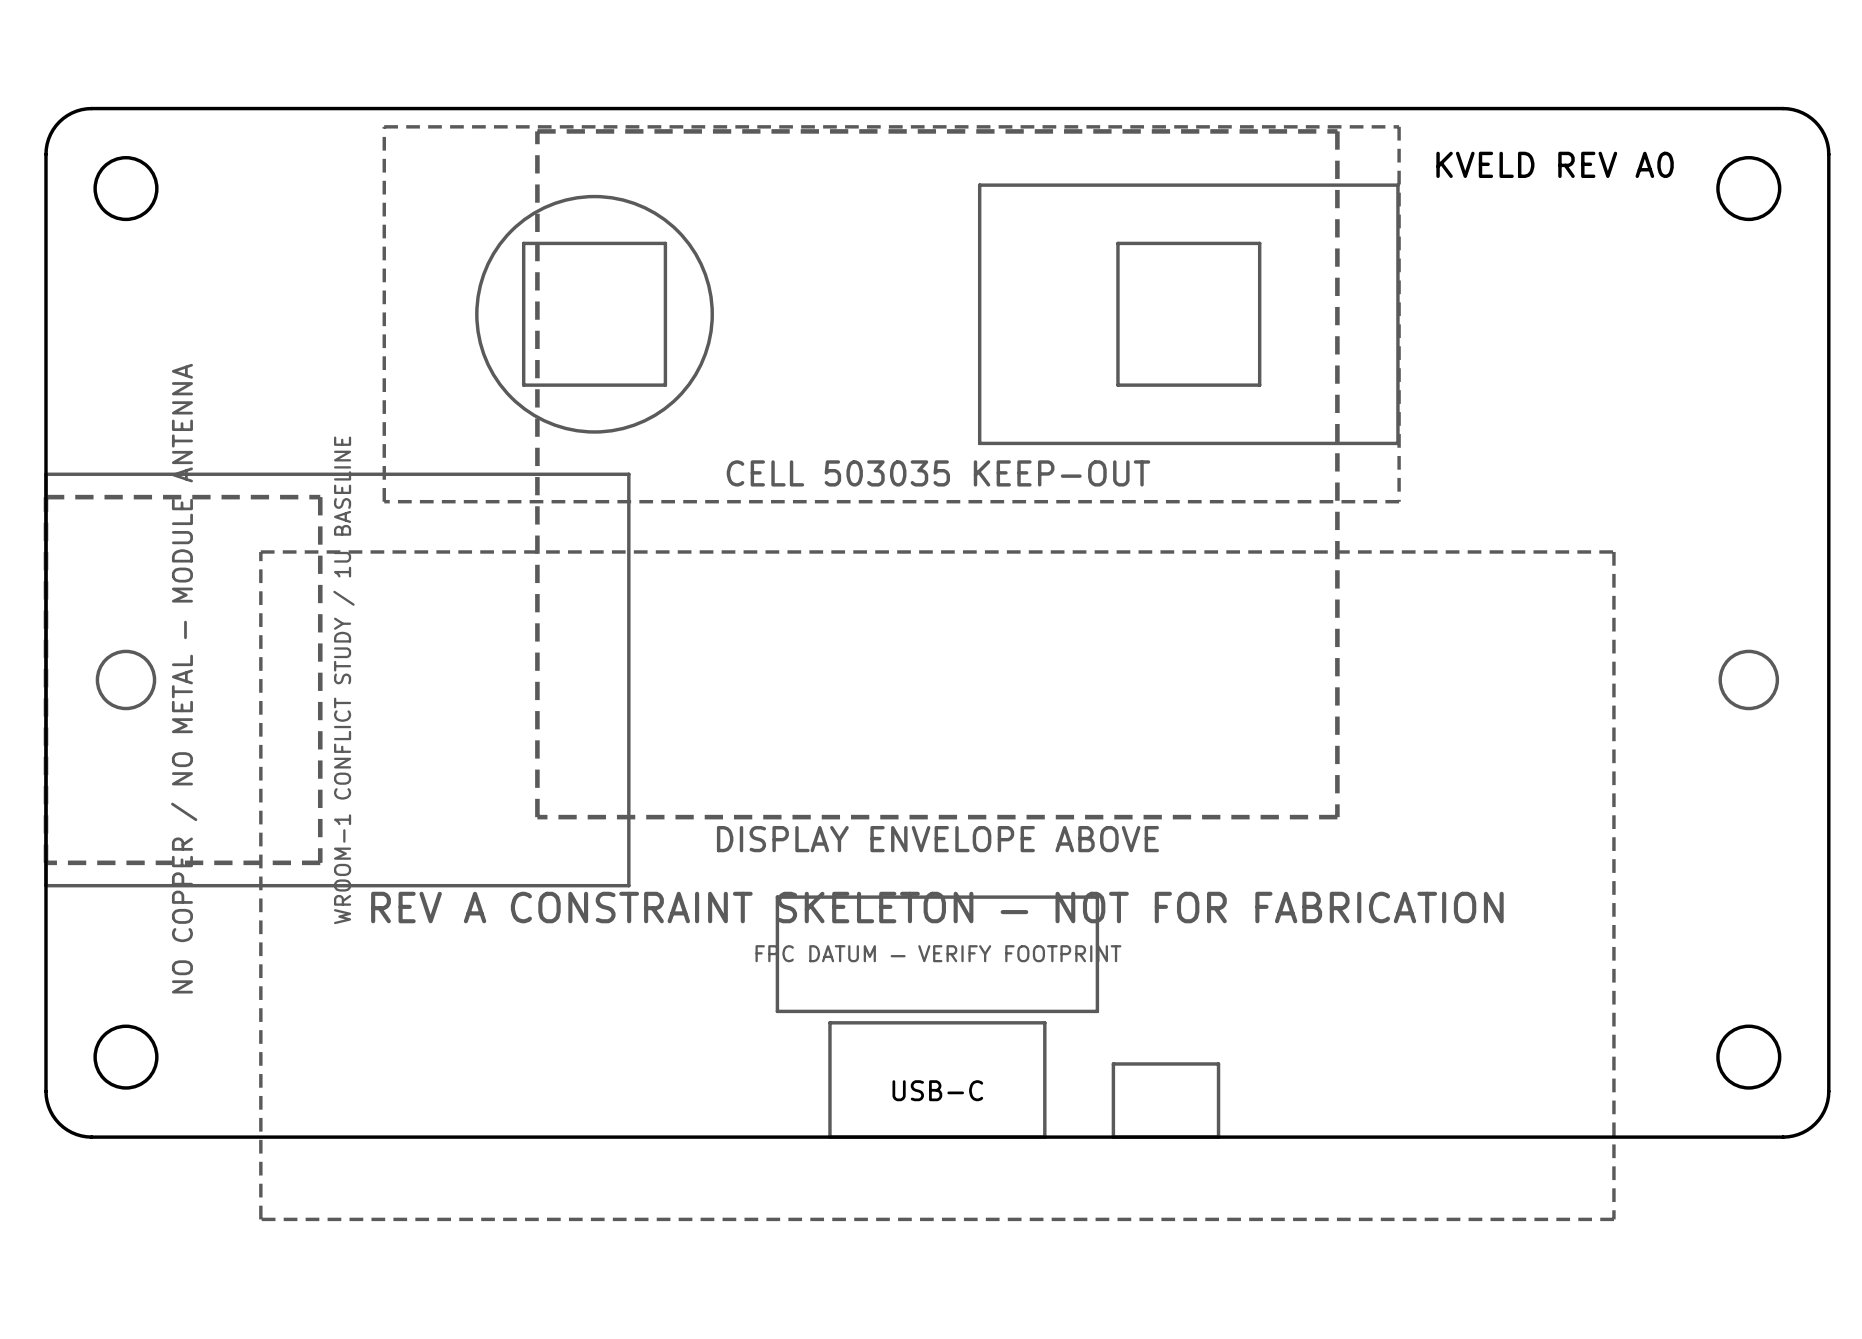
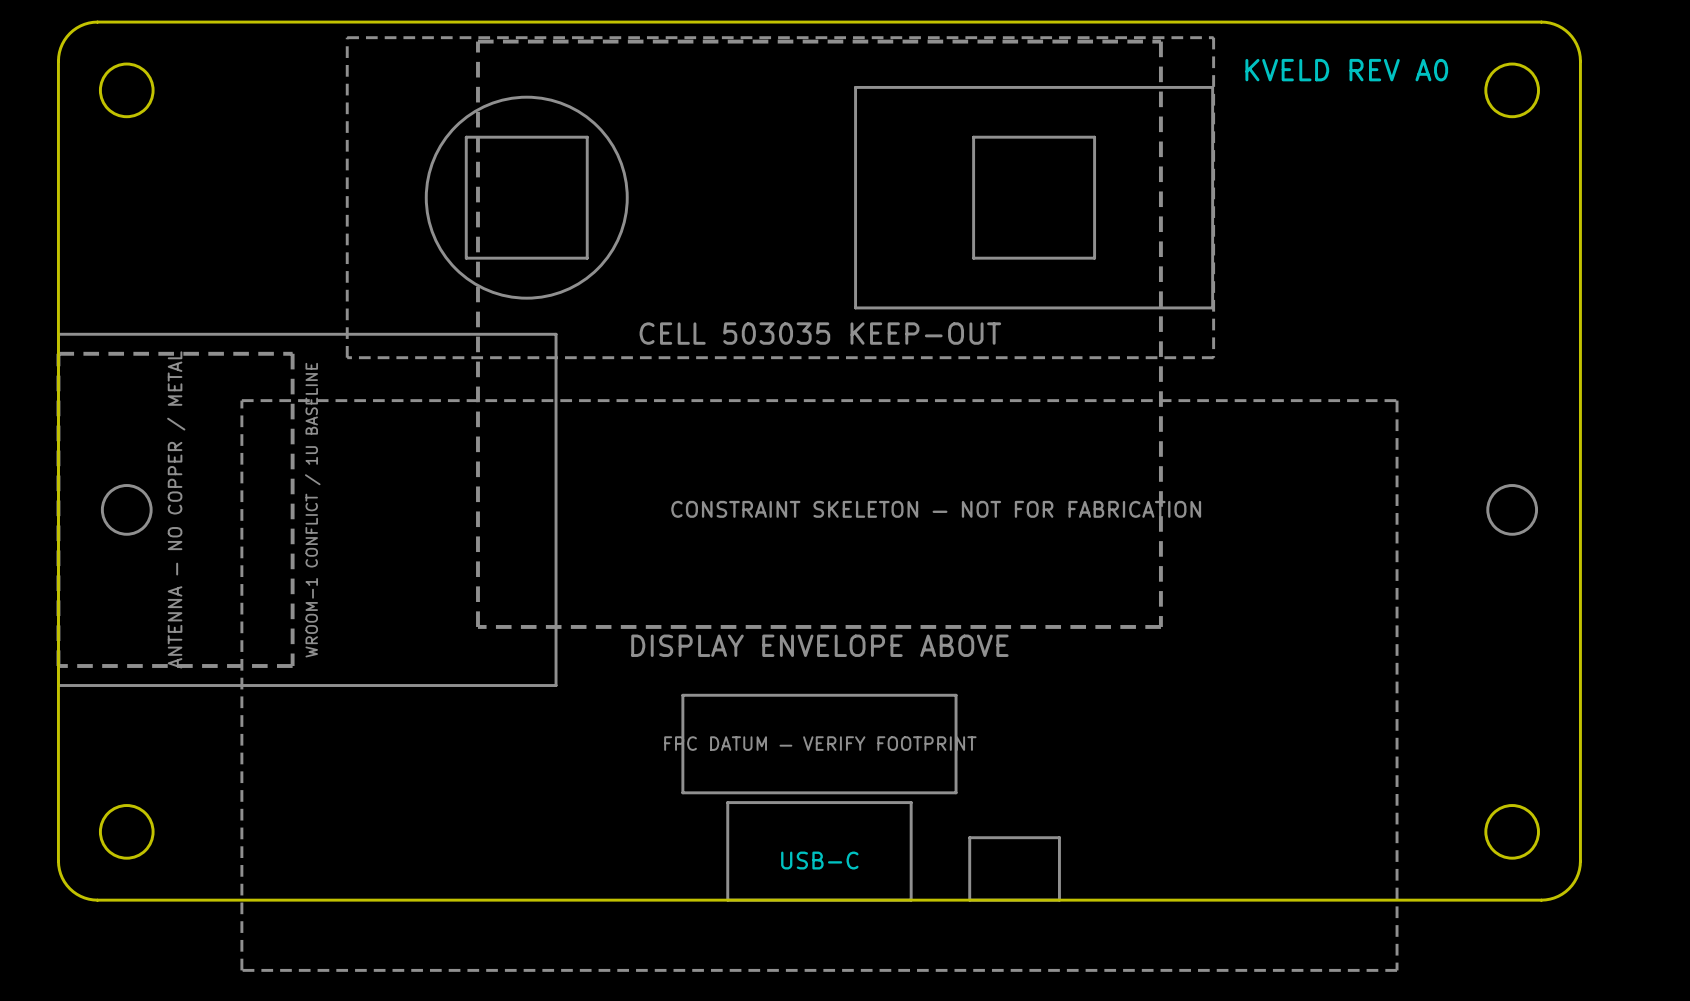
text: NO COPPER / NO METAL — MODULE ANTENNA (184, 678) -> ANTENNA — NO COPPER / METAL (176, 509)
text: none -> CONSTRAINT SKELETON — NOT FOR FABRICATION (936, 509)
text: WROOM-1 CONFLICT STUDY / 1U BASELINE (343, 680) -> WROOM-1 CONFLICT / 1U BASELINE (312, 510)
text: REV A CONSTRAINT SKELETON — NOT FOR FABRICATION (937, 907) -> none

